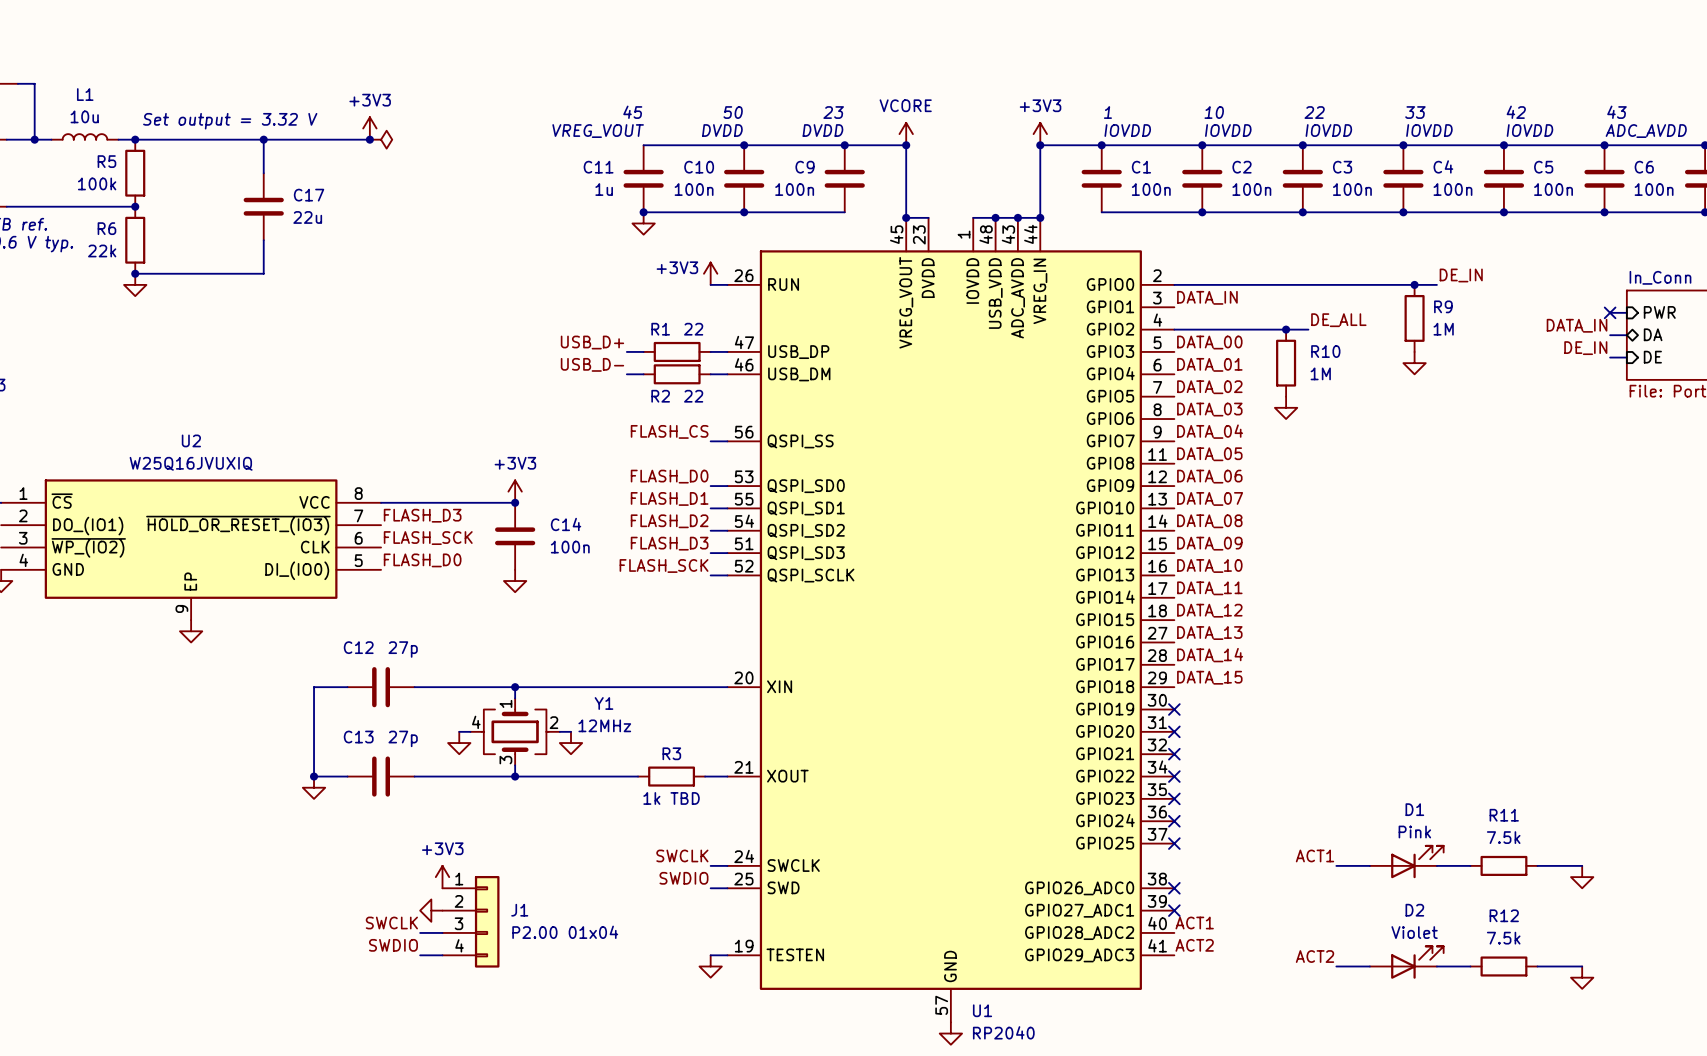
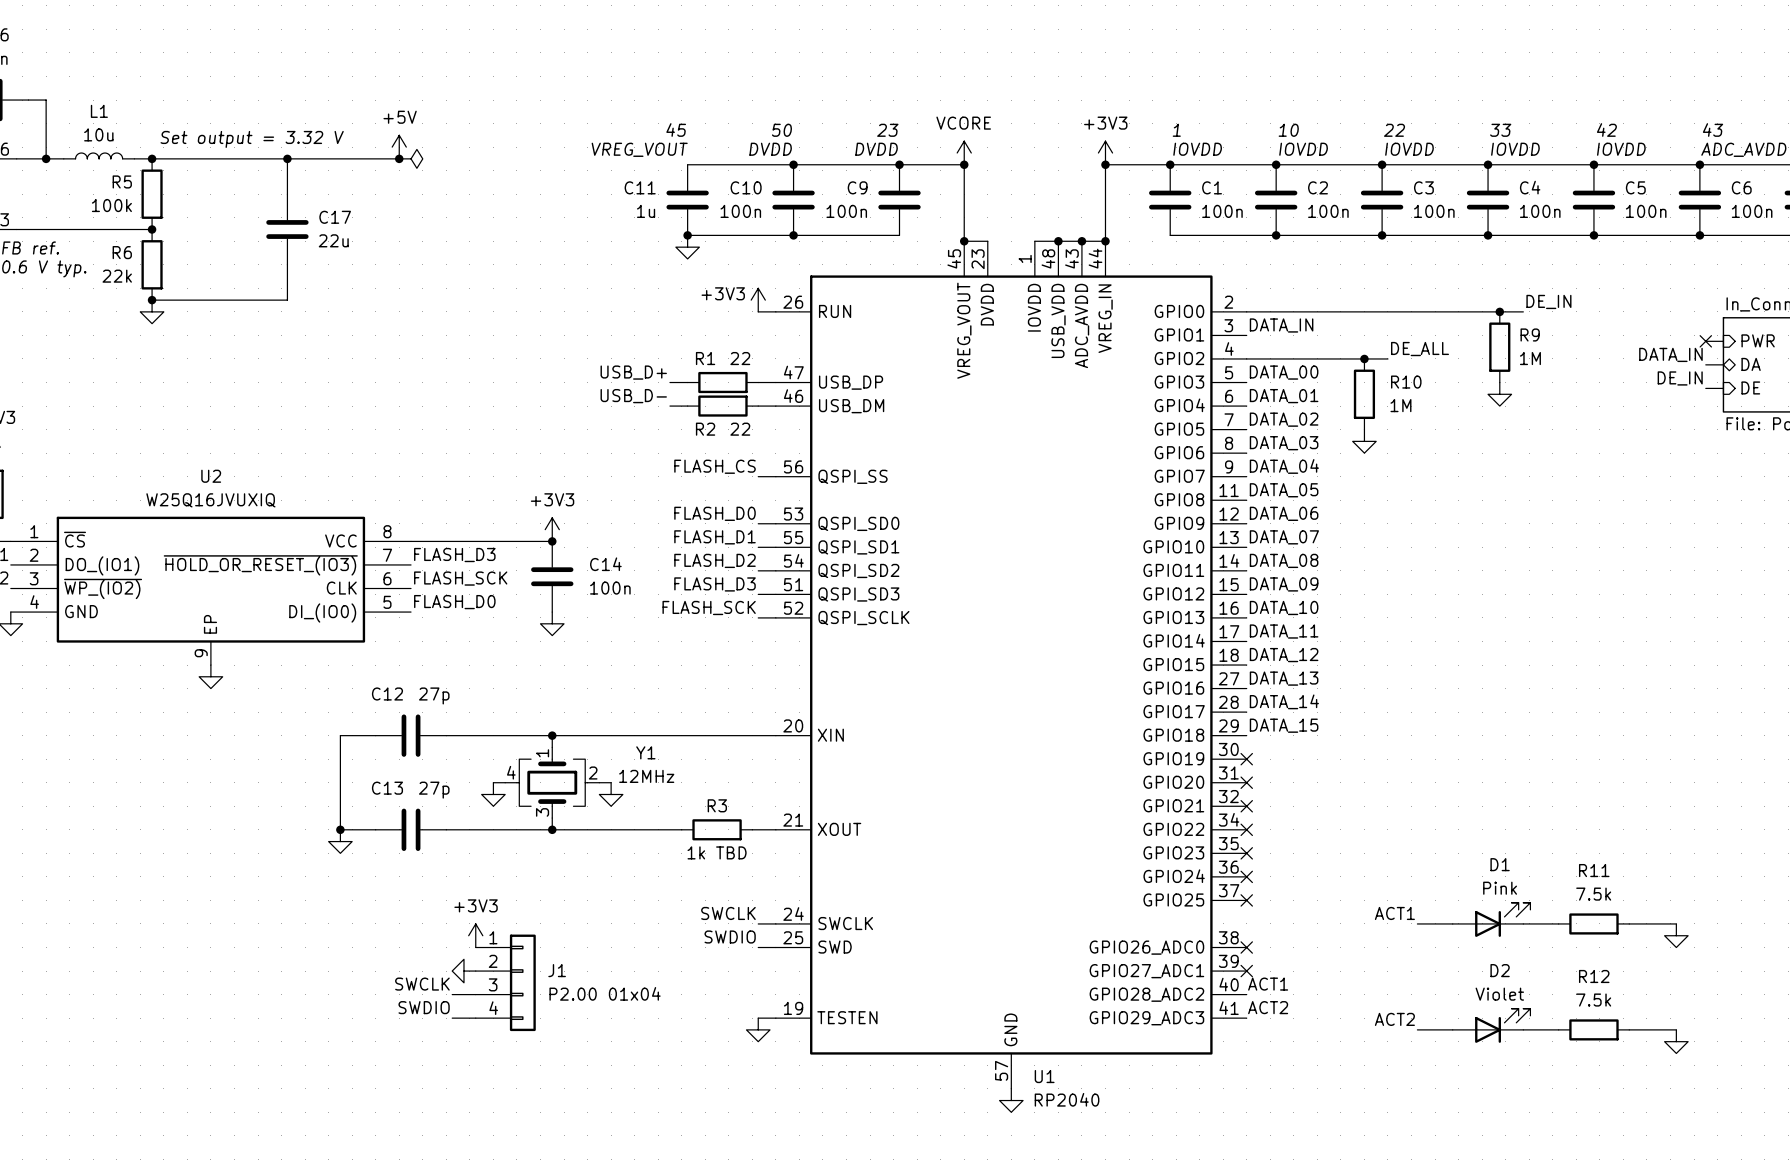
power symbol: +3V3 (369, 128) -> +5V (399, 147)

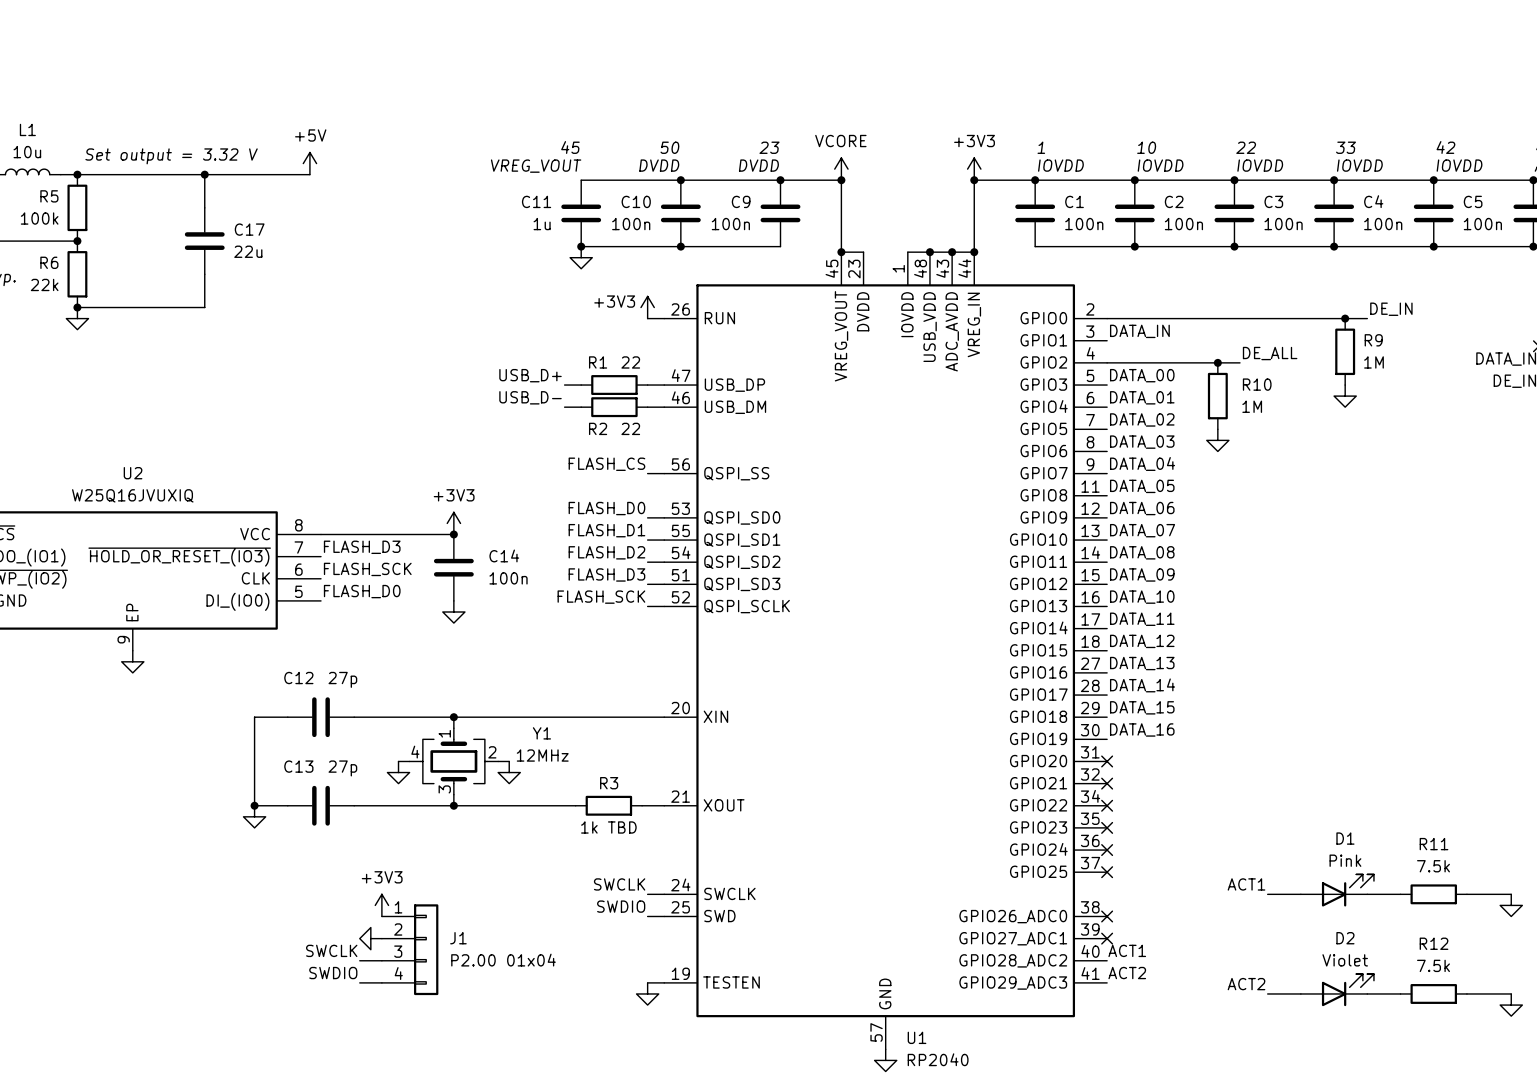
junction: (399, 158) -> none
power symbol: (411, 158) -> none
label: none -> DATA_16 (1142, 729)
no-connect mark: (1246, 759) -> none

